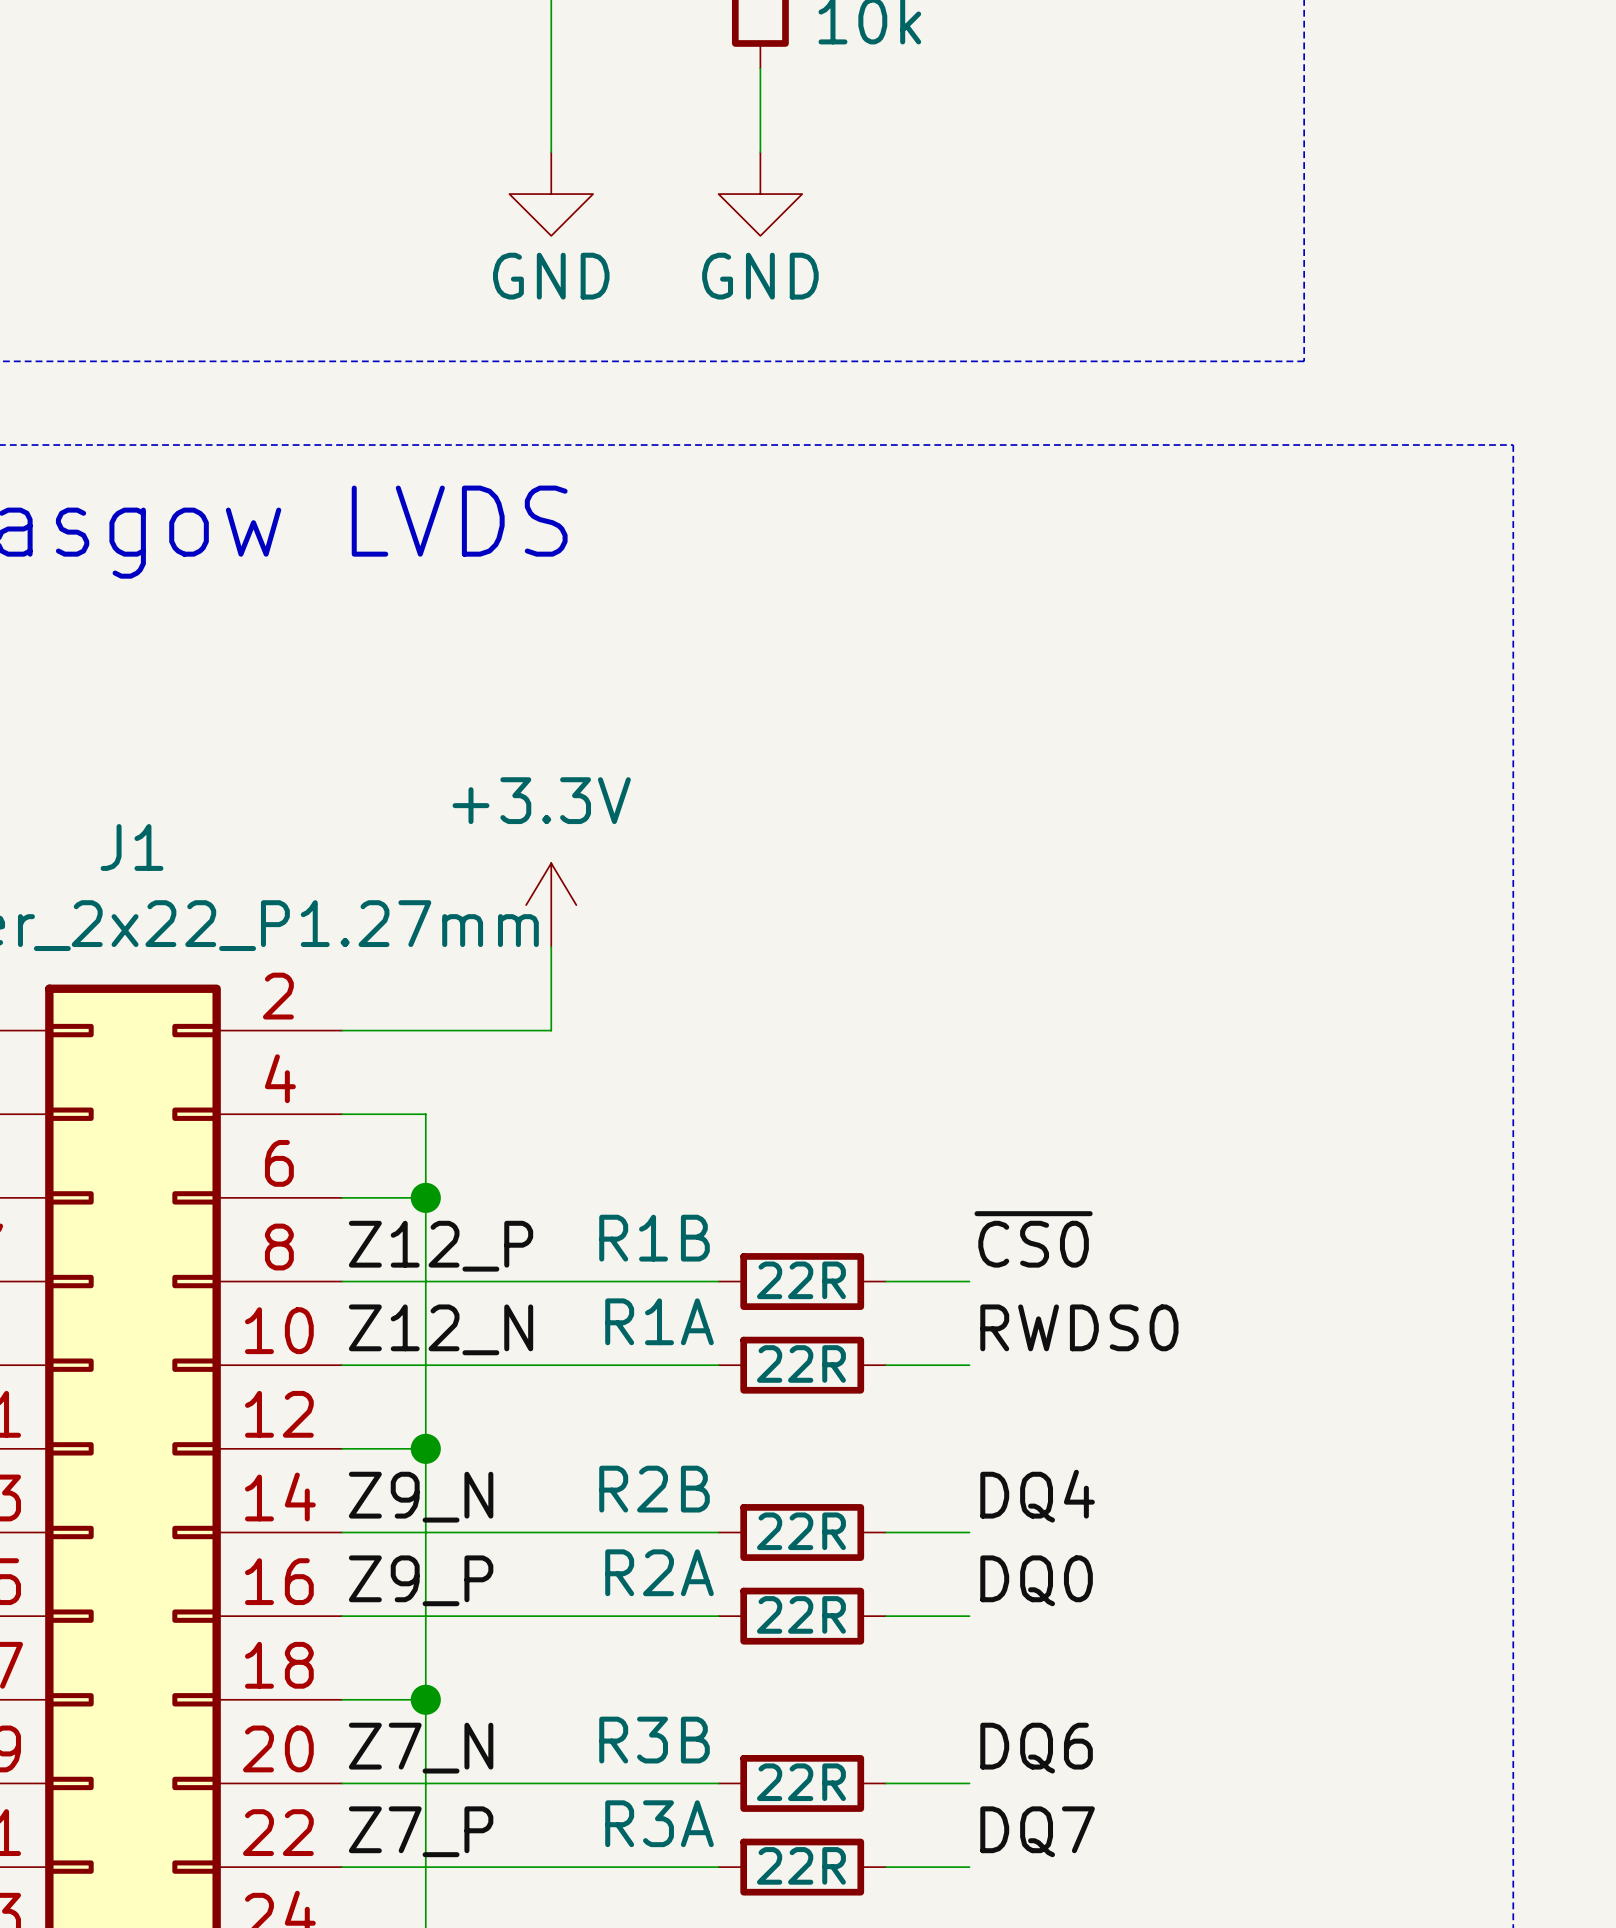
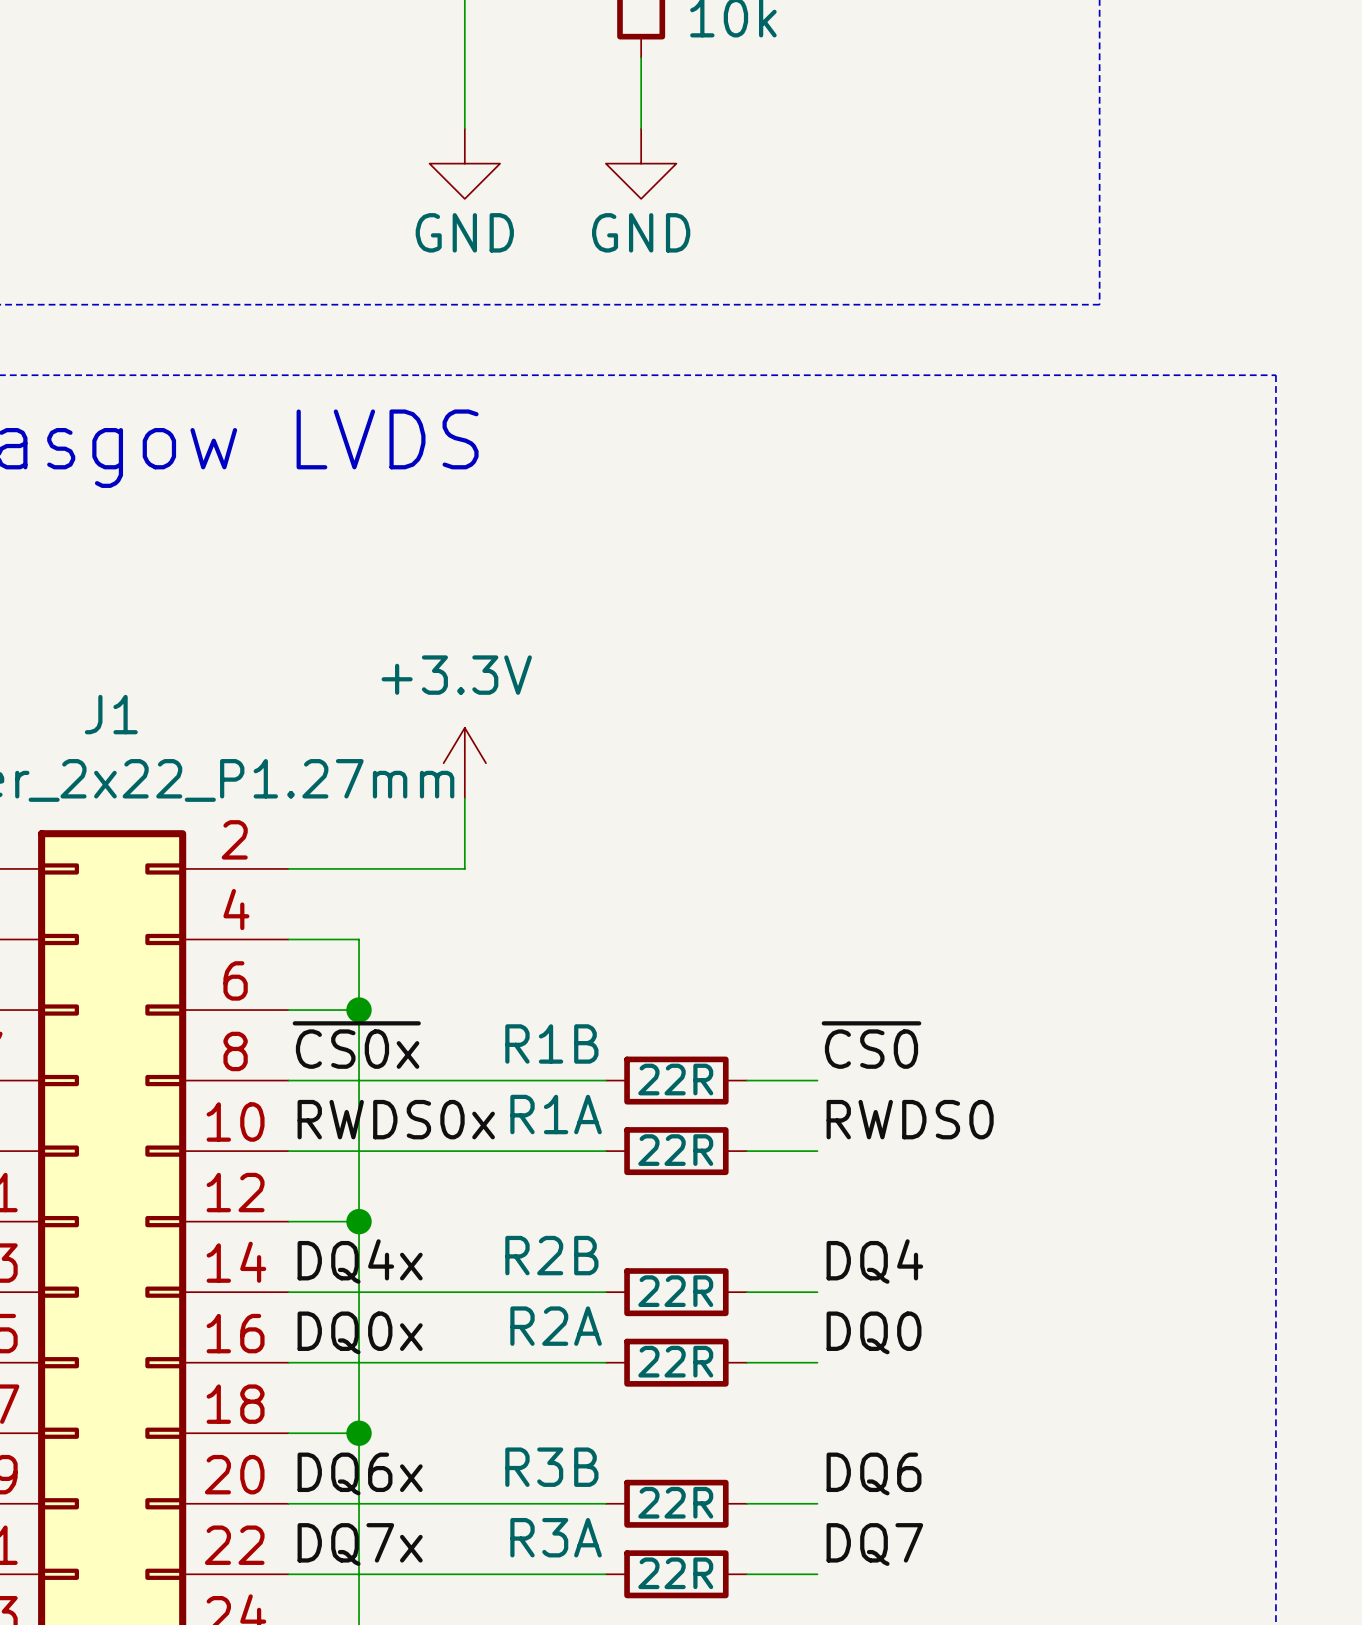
label: Z12_P (441, 1246) -> ~{CS0x} (356, 1045)
label: Z12_N (441, 1329) -> RWDS0x (396, 1119)
label: Z9_N (421, 1497) -> DQ4x (360, 1261)
label: Z9_P (421, 1580) -> DQ0x (360, 1332)
label: Z7_N (421, 1748) -> DQ6x (360, 1473)
label: Z7_P (421, 1831) -> DQ7x (360, 1544)

